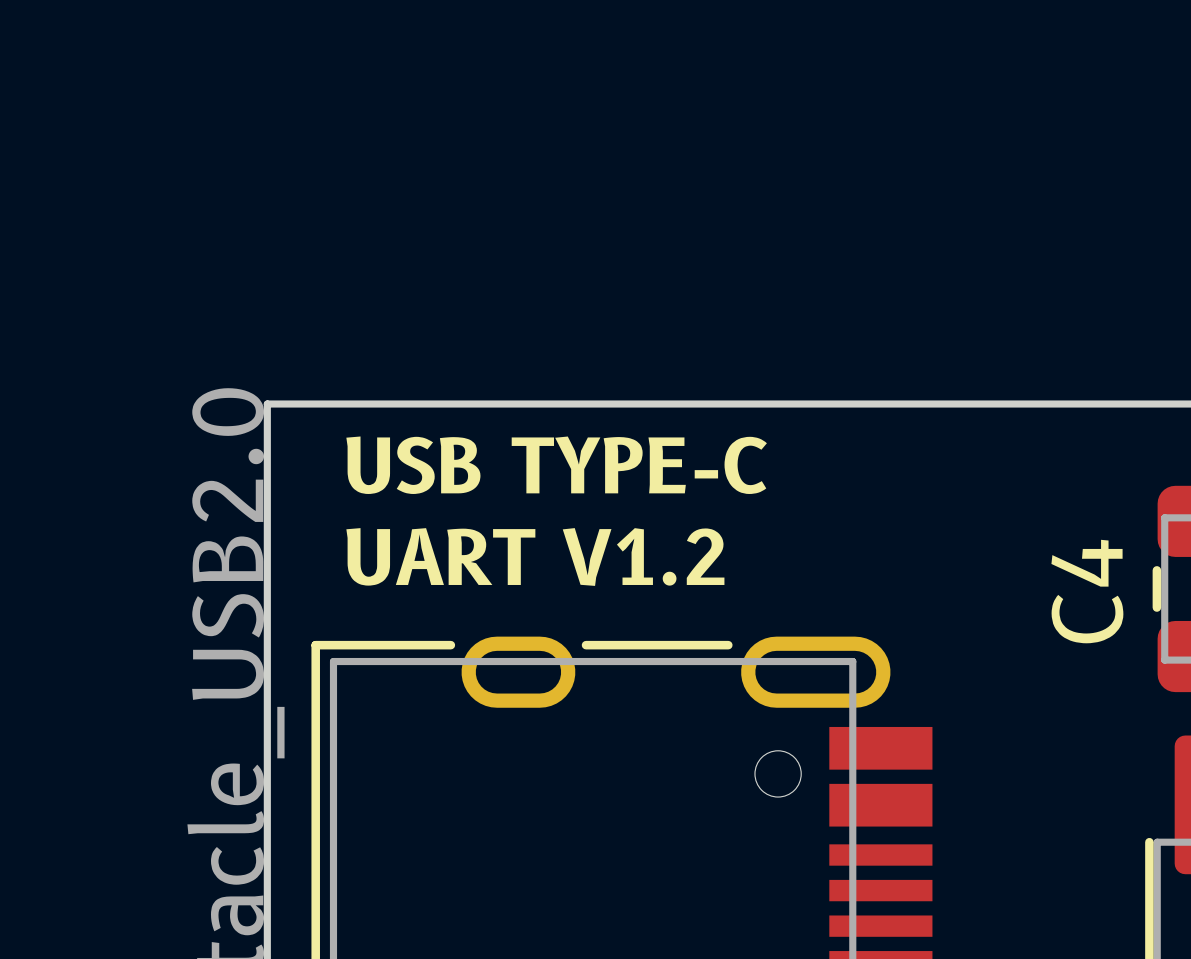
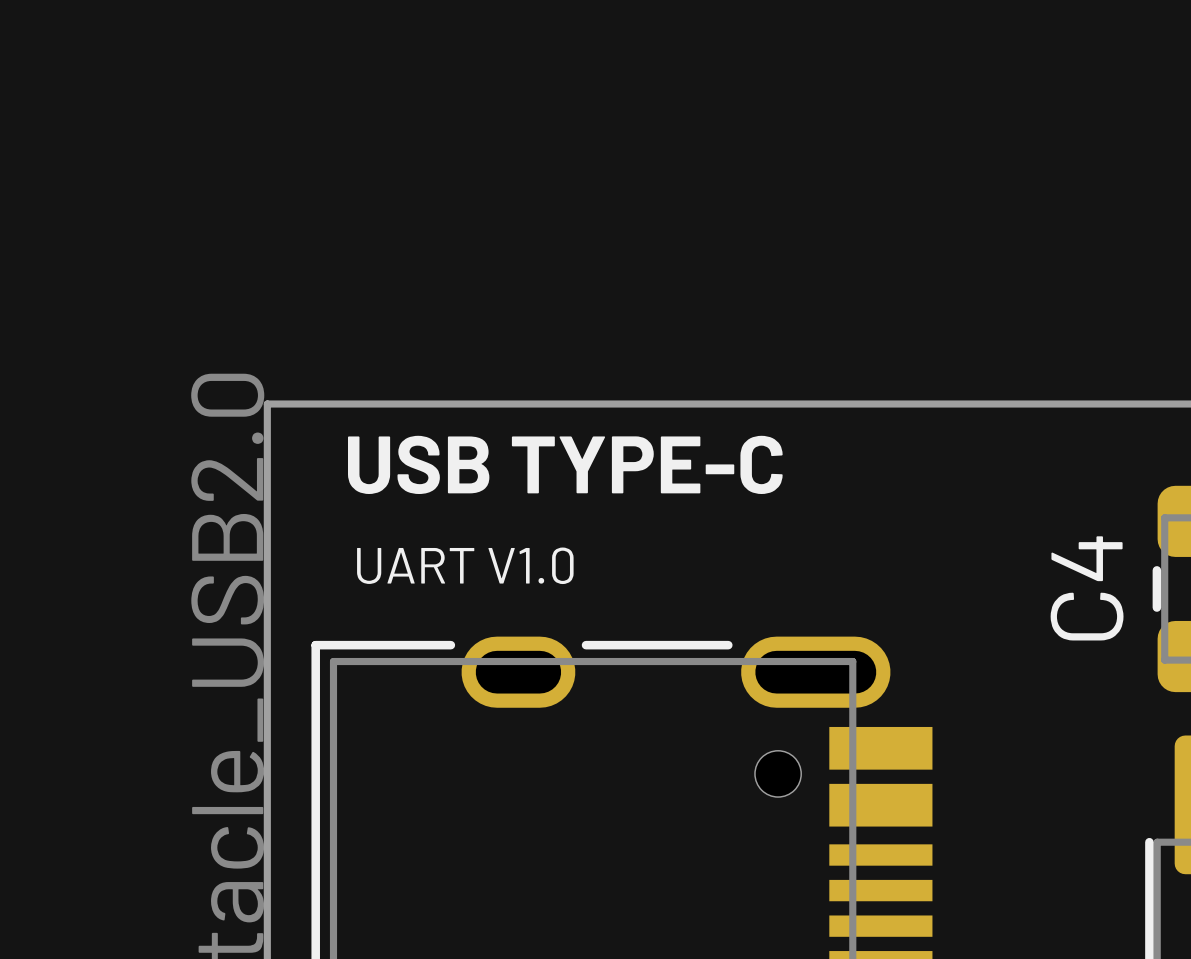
text: UART V1.2 (535, 557) -> UART V1.0 (465, 565)

